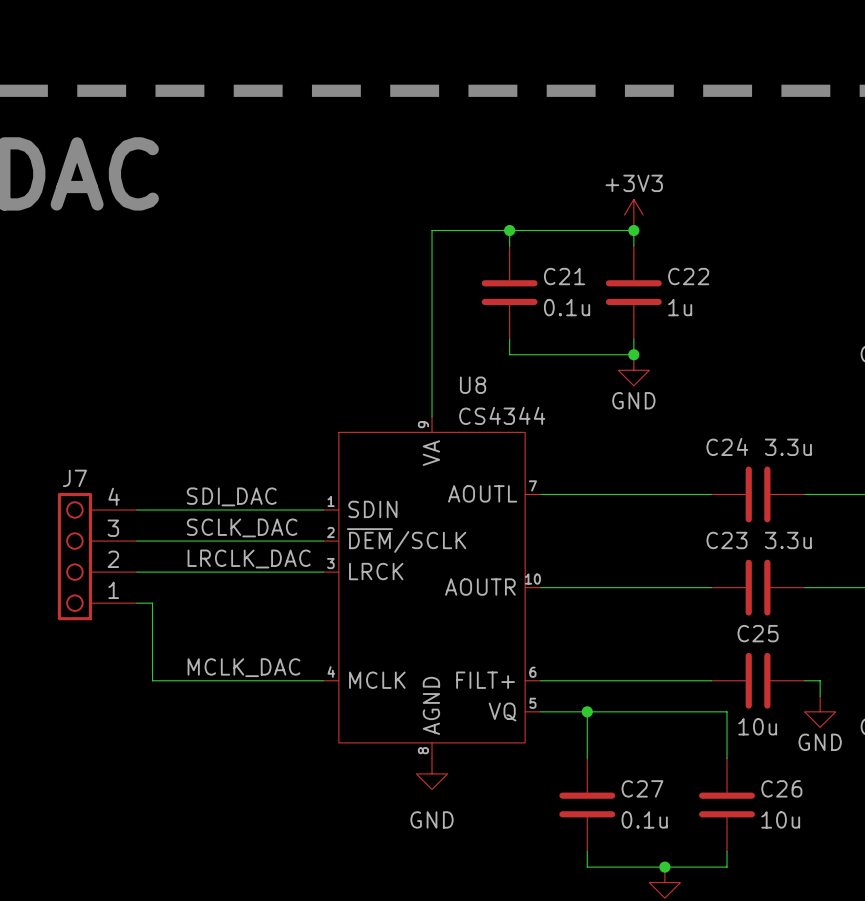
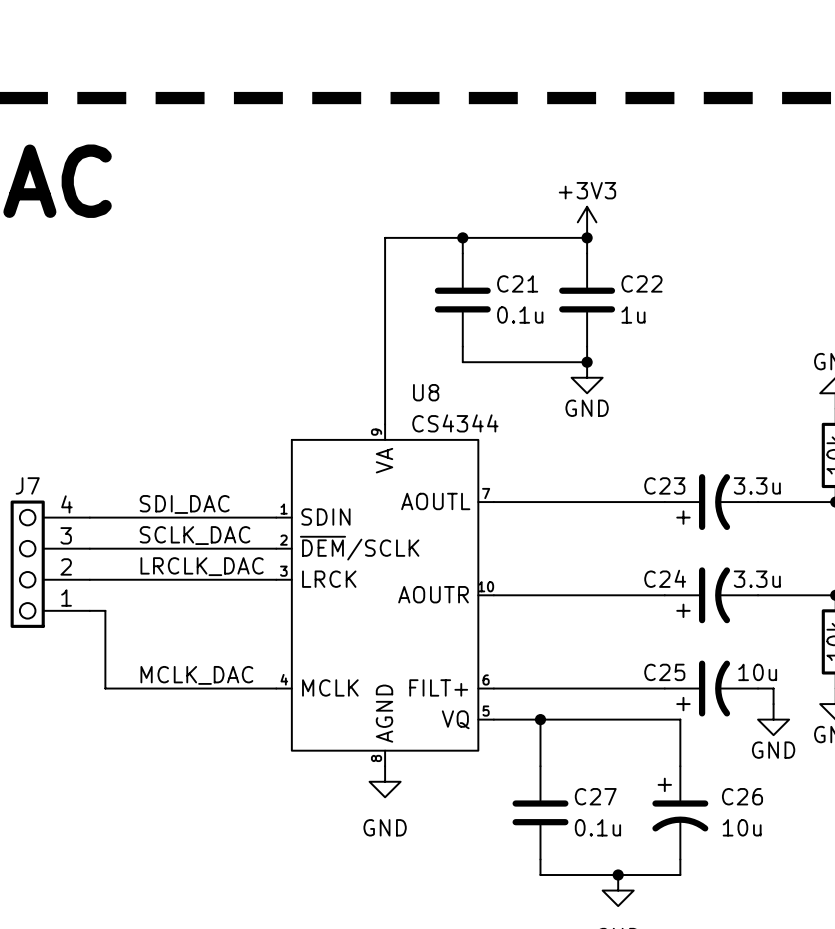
C24 name position: C24 (727, 446) -> C24 (665, 578)
C24 value position: 3.3u (788, 447) -> 3.3u (757, 579)
C24 symbol: [711, 466, 805, 523] -> [664, 567, 759, 624]
C23 name position: C23 (727, 540) -> C23 (664, 485)
C23 value position: 3.3u (788, 540) -> 3.3u (757, 485)
C23 symbol: [711, 559, 805, 616] -> [664, 474, 759, 531]
C25 name position: C25 (758, 633) -> C25 (664, 672)
C25 symbol: [711, 652, 805, 709] -> [664, 660, 759, 717]
C25 value position: 10u (757, 726) -> 10u (757, 672)
C26 symbol: [699, 758, 755, 852] -> [652, 766, 709, 860]

